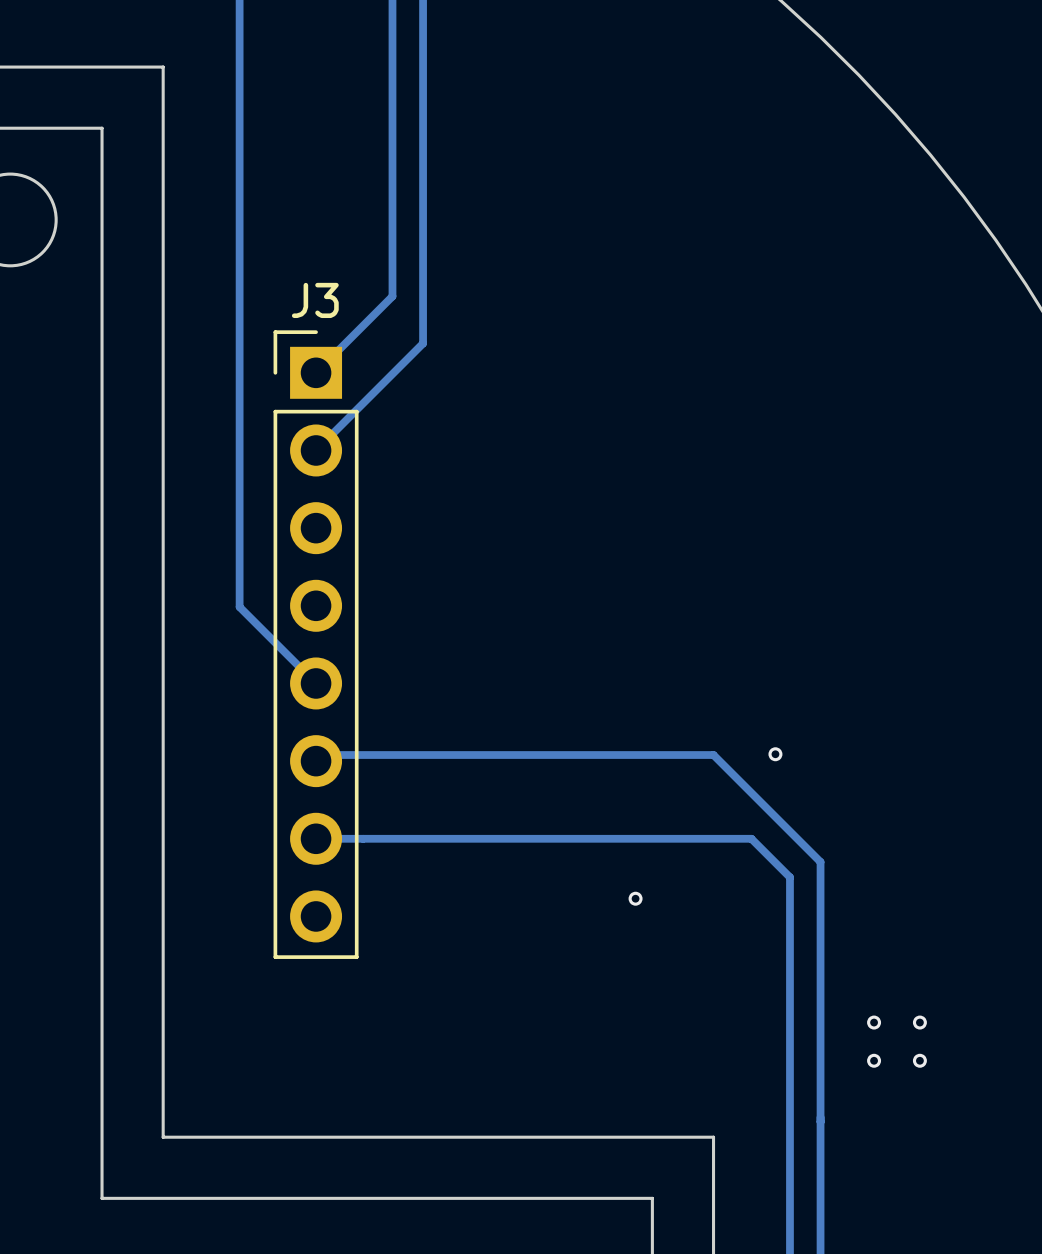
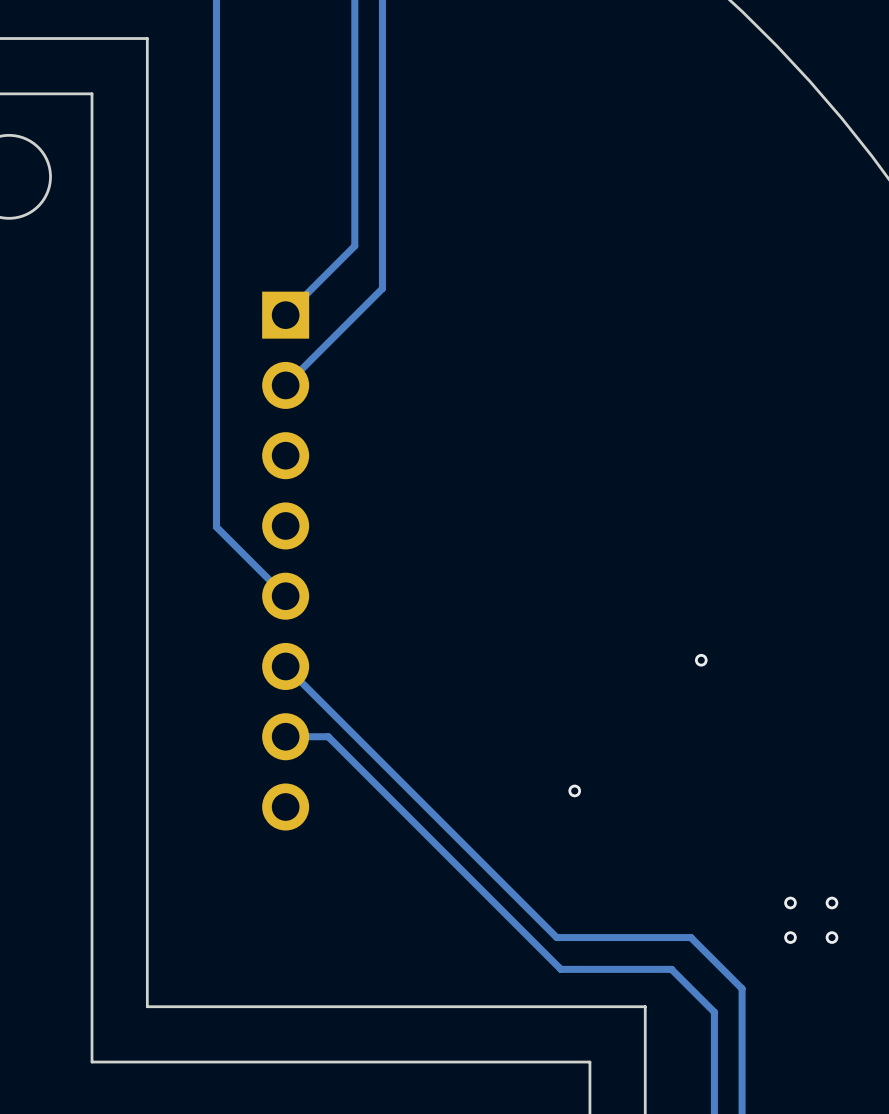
J3 side: bottom (316, 644) -> top (285, 561)
track: (316, 761) (322, 755) (713, 755) (820, 862) (820, 1117) -> (285, 666) (556, 937) (690, 937) (742, 988)
track: (363, 838) (751, 838) (789, 877) (789, 1143) -> (328, 736) (560, 969) (671, 969) (714, 1012)

